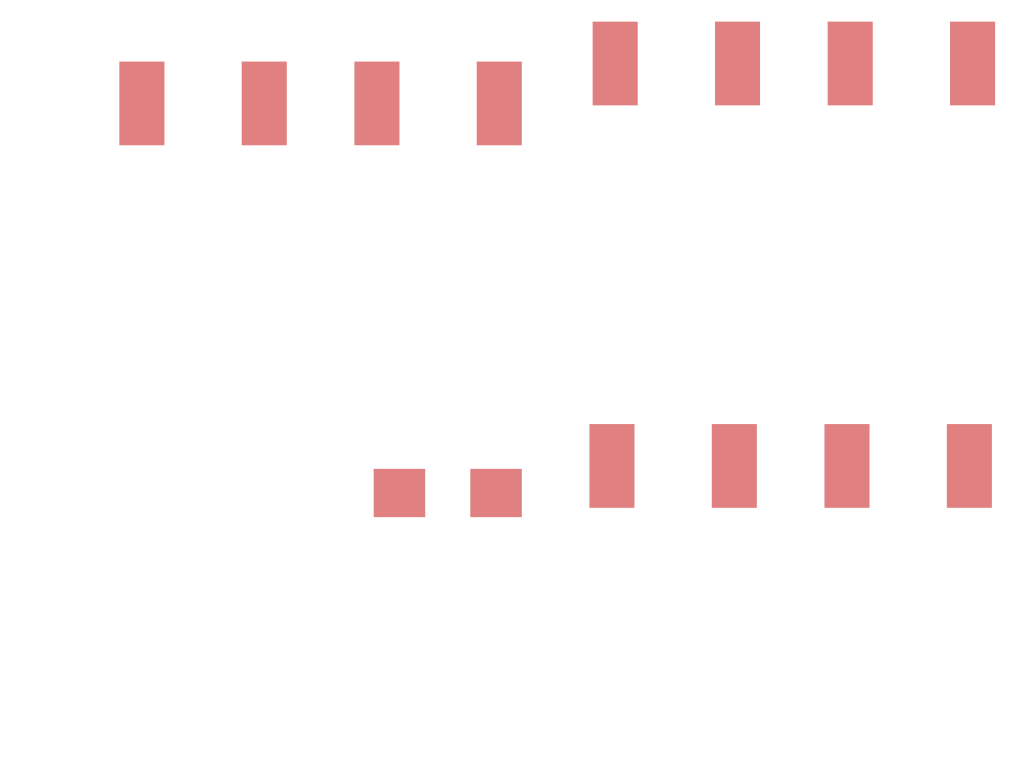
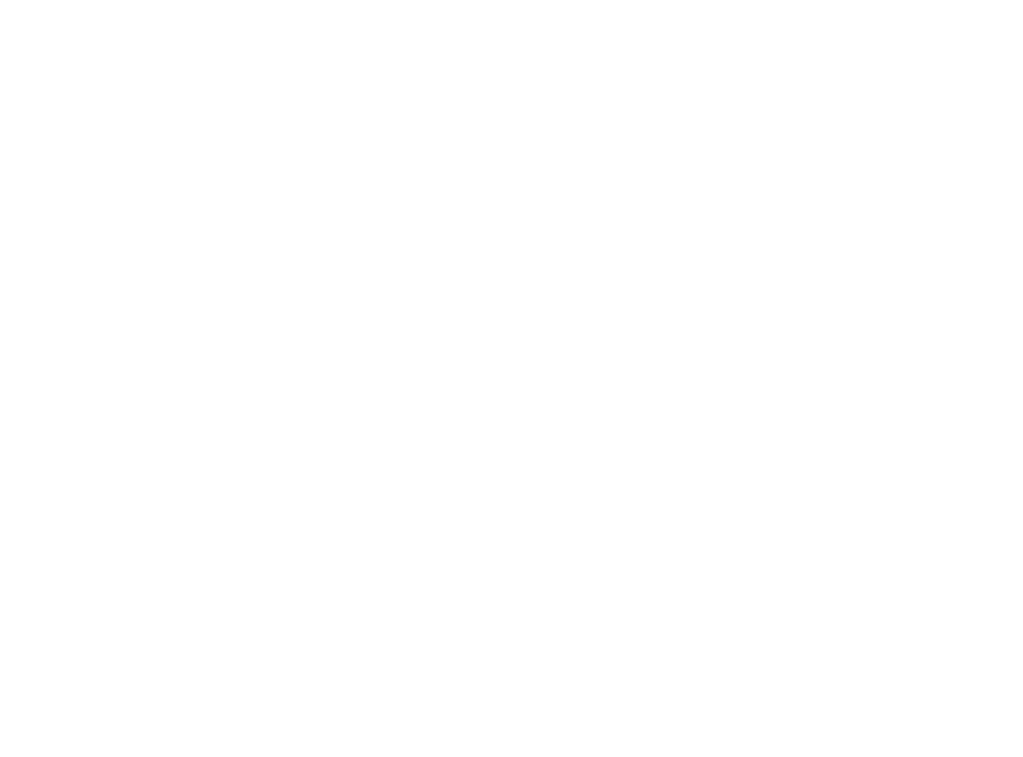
part: (676, 63) -> none
part: (911, 63) -> none
part: (203, 103) -> none
part: (438, 103) -> none
part: (673, 465) -> none
part: (908, 465) -> none
part: (447, 492) -> none

